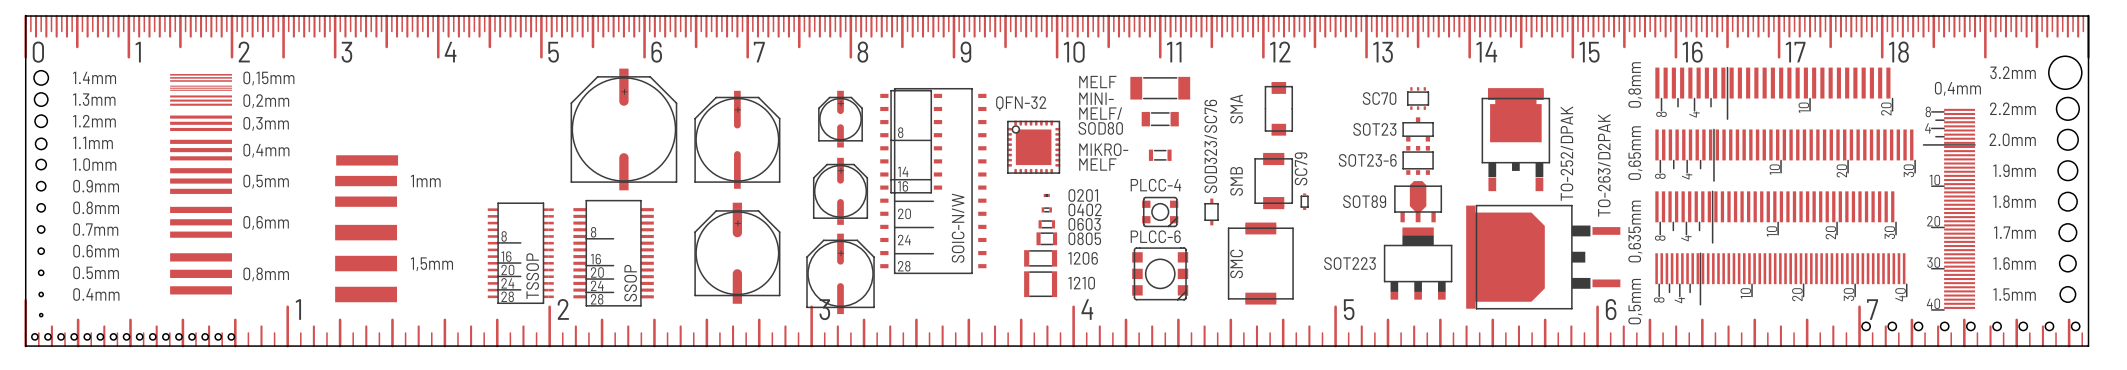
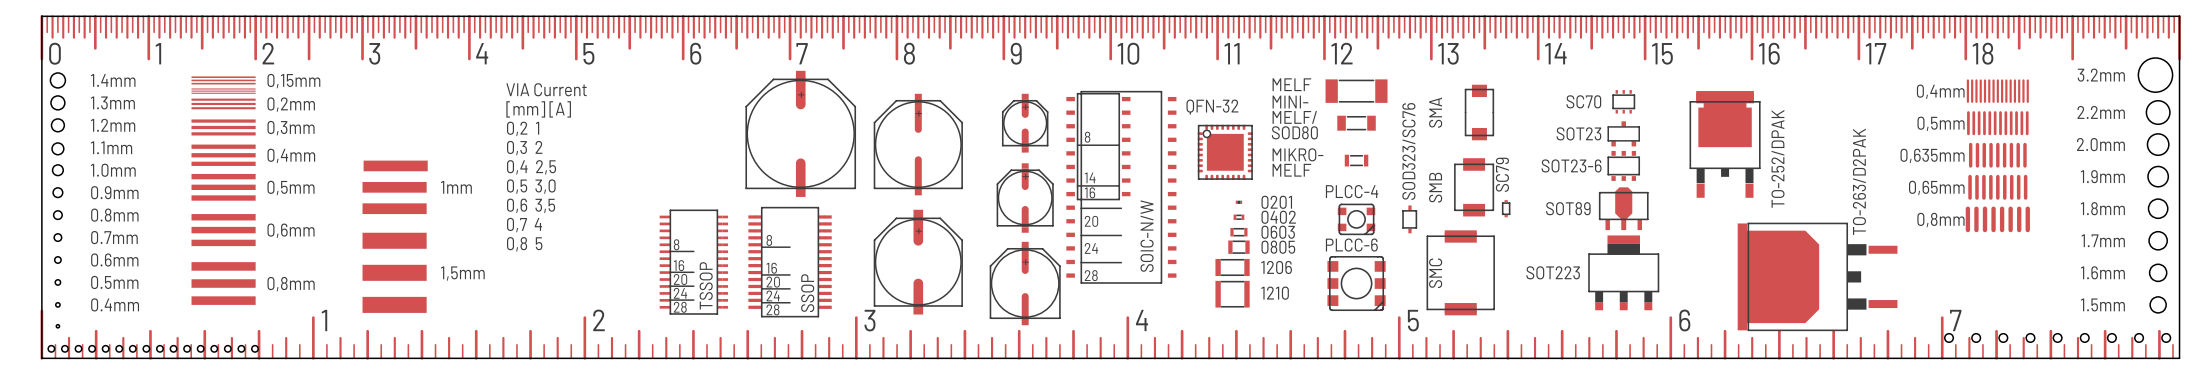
drawing: none -> [1965, 79, 2030, 233]
text: MELF (1097, 82) -> none
text: none -> MELF (1291, 84)
text: 0,8mm (1635, 84) -> none
text: none -> VIA Current (546, 89)
part position: (1160, 88) -> (1356, 91)
text position: 0,4mm (1957, 88) -> 0,4mm (1940, 91)
part: (1774, 93) -> none
text position: MINI- (1096, 98) -> MINI- (1290, 102)
text position: SC70 (1379, 98) -> SC70 (1583, 101)
part position: (1418, 98) -> (1623, 101)
text position: QFN-32 (1021, 103) -> QFN-32 (1212, 107)
text: none -> [mm] [A] (538, 109)
part position: (1278, 108) -> (1479, 112)
text position: SMA (1236, 109) -> SMA (1435, 112)
text position: MELF/ (1100, 113) -> MELF/ (1294, 117)
part position: (840, 119) -> (1025, 123)
part position: (1160, 119) -> (1356, 123)
text: none -> 0,5mm (1941, 123)
text: none -> 0,2 1 (523, 128)
text position: SOD80 (1100, 128) -> SOD80 (1294, 132)
part position: (623, 129) -> (800, 133)
text position: SOT23 (1374, 129) -> SOT23 (1578, 133)
part position: (1418, 129) -> (1623, 133)
part position: (737, 139) -> (918, 144)
part position: (1515, 139) -> (1725, 144)
text: none -> 0,3 2 (524, 148)
text position: SOD323/SC76 (1210, 146) -> SOD323/SC76 (1408, 151)
drawing position: (1033, 147) -> (1225, 152)
text position: MIKRO- (1103, 149) -> MIKRO- (1297, 154)
text: none -> 0,635mm (1932, 155)
text position: TO-252/DPAK (1566, 153) -> TO-252/DPAK (1777, 158)
text rotation: 0° (1635, 153) -> 90° clockwise (1936, 187)
text position: 0,65mm (1635, 153) -> 0,65mm (1936, 187)
part position: (1160, 155) -> (1356, 160)
part: (1785, 155) -> none
text position: SOT23-6 (1367, 160) -> SOT23-6 (1571, 165)
part position: (1418, 160) -> (1623, 165)
text: none -> 0,4 2,5 (531, 167)
text: MELF (1097, 164) -> none
text: none -> MELF (1291, 170)
text position: TO-263/D2PAK (1604, 165) -> TO-263/D2PAK (1859, 181)
text position: SC79 (1301, 168) -> SC79 (1502, 174)
text: none -> 0,5 3,0 (531, 186)
part position: (933, 181) -> (1121, 187)
text position: SMB (1236, 181) -> SMB (1435, 187)
part position: (1273, 181) -> (1474, 187)
text position: PLCC-4 (1155, 185) -> PLCC-4 (1352, 191)
part position: (840, 191) -> (1025, 198)
part position: (1046, 195) -> (1238, 202)
text position: 0201 (1083, 195) -> 0201 (1276, 202)
text: none -> 0,6 3,5 (531, 205)
part position: (1304, 201) -> (1506, 208)
text position: SOT89 (1364, 201) -> SOT89 (1568, 208)
part position: (1418, 201) -> (1623, 208)
part footprint: [694, 202, 781, 304] -> [748, 206, 832, 318]
part position: (1046, 209) -> (1238, 217)
text position: 0402 (1085, 209) -> 0402 (1278, 217)
part: (1949, 209) -> none
part position: (1160, 211) -> (1356, 219)
part position: (1211, 211) -> (1409, 219)
text: none -> 0,8mm (1940, 220)
text: none -> 0,7 4 (524, 225)
part: (1775, 217) -> none
part position: (1046, 224) -> (1238, 232)
text position: 0603 (1084, 224) -> 0603 (1278, 232)
text position: SOIC-N/W (958, 228) -> SOIC-N/W (1147, 236)
text: 0,635mm (1635, 231) -> none
text: none -> 0,8 5 (524, 244)
text position: PLCC-6 (1155, 236) -> PLCC-6 (1351, 245)
part position: (1046, 238) -> (1238, 247)
text position: 0805 (1084, 238) -> 0805 (1278, 247)
part position: (520, 253) -> (693, 262)
part: (613, 253) -> none
part: none -> (918, 262)
part position: (1543, 257) -> (1817, 276)
part position: (1040, 258) -> (1232, 267)
text position: 1206 (1083, 258) -> 1206 (1276, 267)
text position: SMC (1236, 263) -> SMC (1435, 273)
part position: (1260, 263) -> (1460, 272)
text position: SOT223 (1349, 263) -> SOT223 (1553, 272)
part position: (1418, 263) -> (1623, 272)
part position: (840, 273) -> (1025, 283)
part position: (1160, 273) -> (1356, 283)
text position: TSSOP (532, 276) -> TSSOP (706, 285)
part: (1781, 279) -> none
text position: SSOP (630, 283) -> SSOP (807, 293)
text position: 1210 (1081, 283) -> 1210 (1275, 293)
part position: (1040, 284) -> (1232, 294)
text: 0,5mm (1635, 301) -> none

